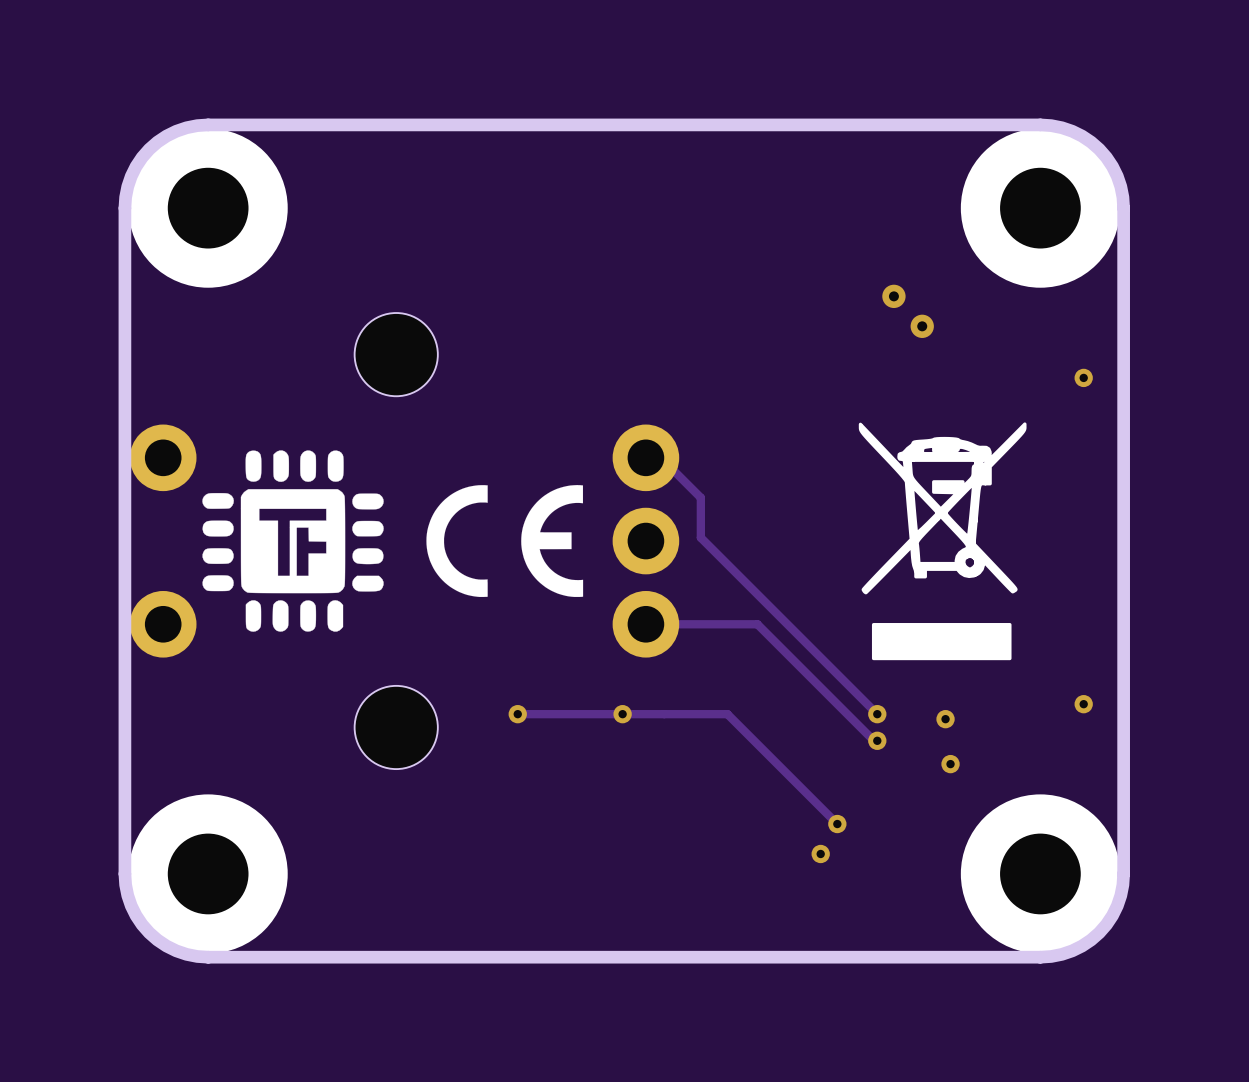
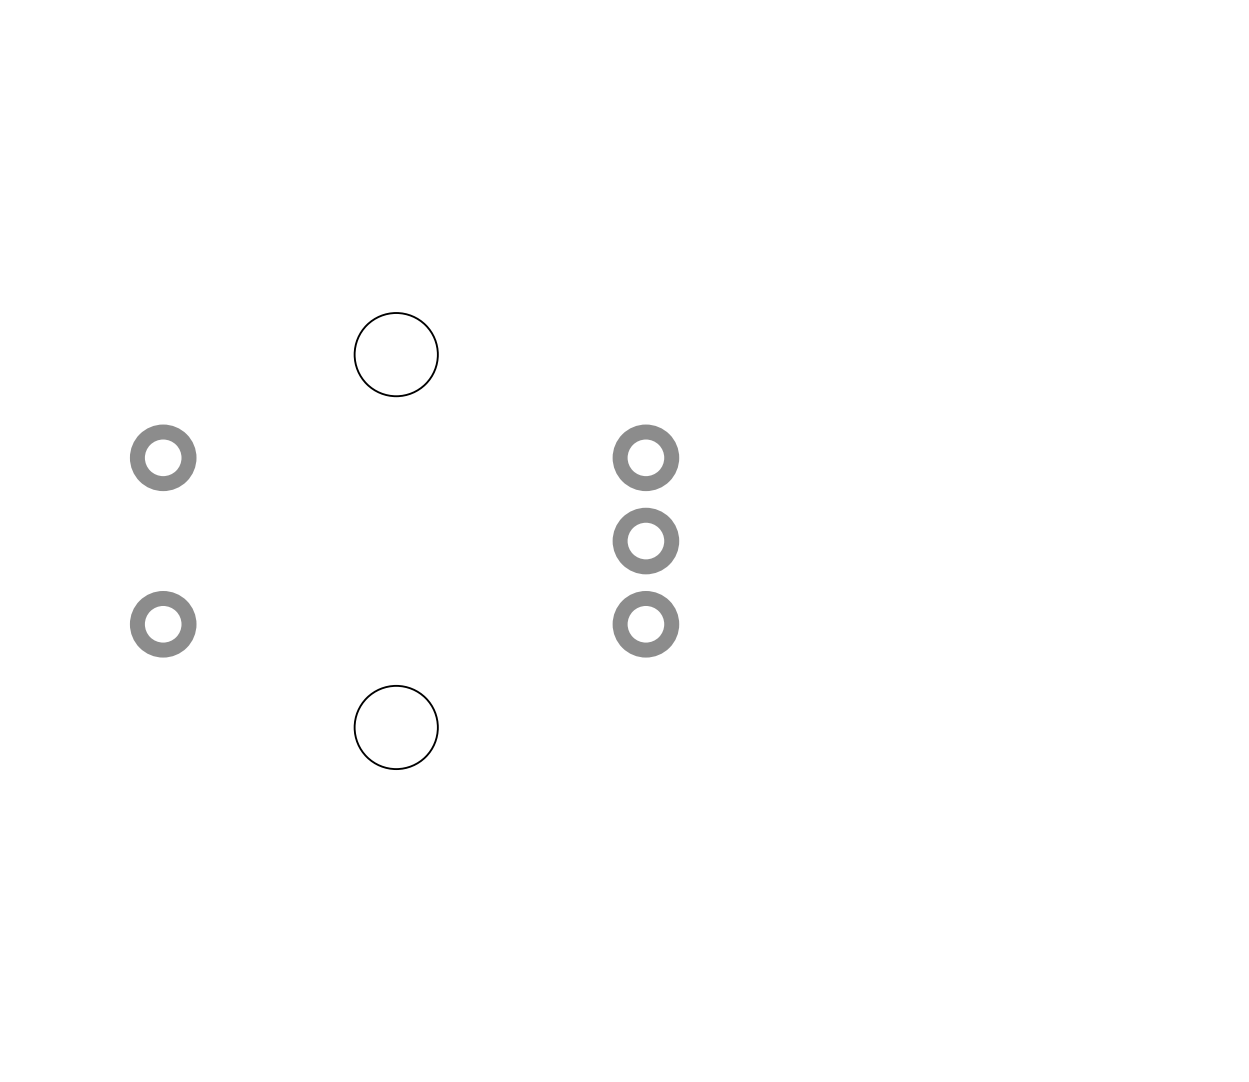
board edge: (1040, 124) (208, 124) (176, 131) (149, 149) (131, 176) (124, 208) (124, 873) (131, 905) (149, 932) (176, 950) (208, 957) (1040, 957) (1072, 950) (1099, 932) (1117, 905) (1123, 873) (1122, 197) (1112, 166) (1099, 149) (1072, 131) (1040, 124) -> none
part: (208, 208) -> none
part: (1040, 208) -> none
via: (893, 296) -> none
via: (922, 326) -> none
via: (1083, 377) -> none
drawing: [858, 422, 1027, 661] -> none
drawing: [202, 450, 384, 632] -> none
track: (645, 457) (660, 457) (700, 497) (700, 537) (877, 714) -> none
drawing: [426, 485, 584, 597] -> none
track: (664, 642) (645, 624) (757, 624) (873, 740) (877, 740) -> none
via: (1083, 704) -> none
track: (517, 714) (727, 714) (837, 824) -> none
via: (517, 714) -> none
via: (622, 714) -> none
via: (877, 714) -> none
via: (945, 719) -> none
via: (877, 740) -> none
via: (950, 764) -> none
via: (837, 824) -> none
via: (820, 853) -> none
part: (208, 873) -> none
part: (1040, 873) -> none

